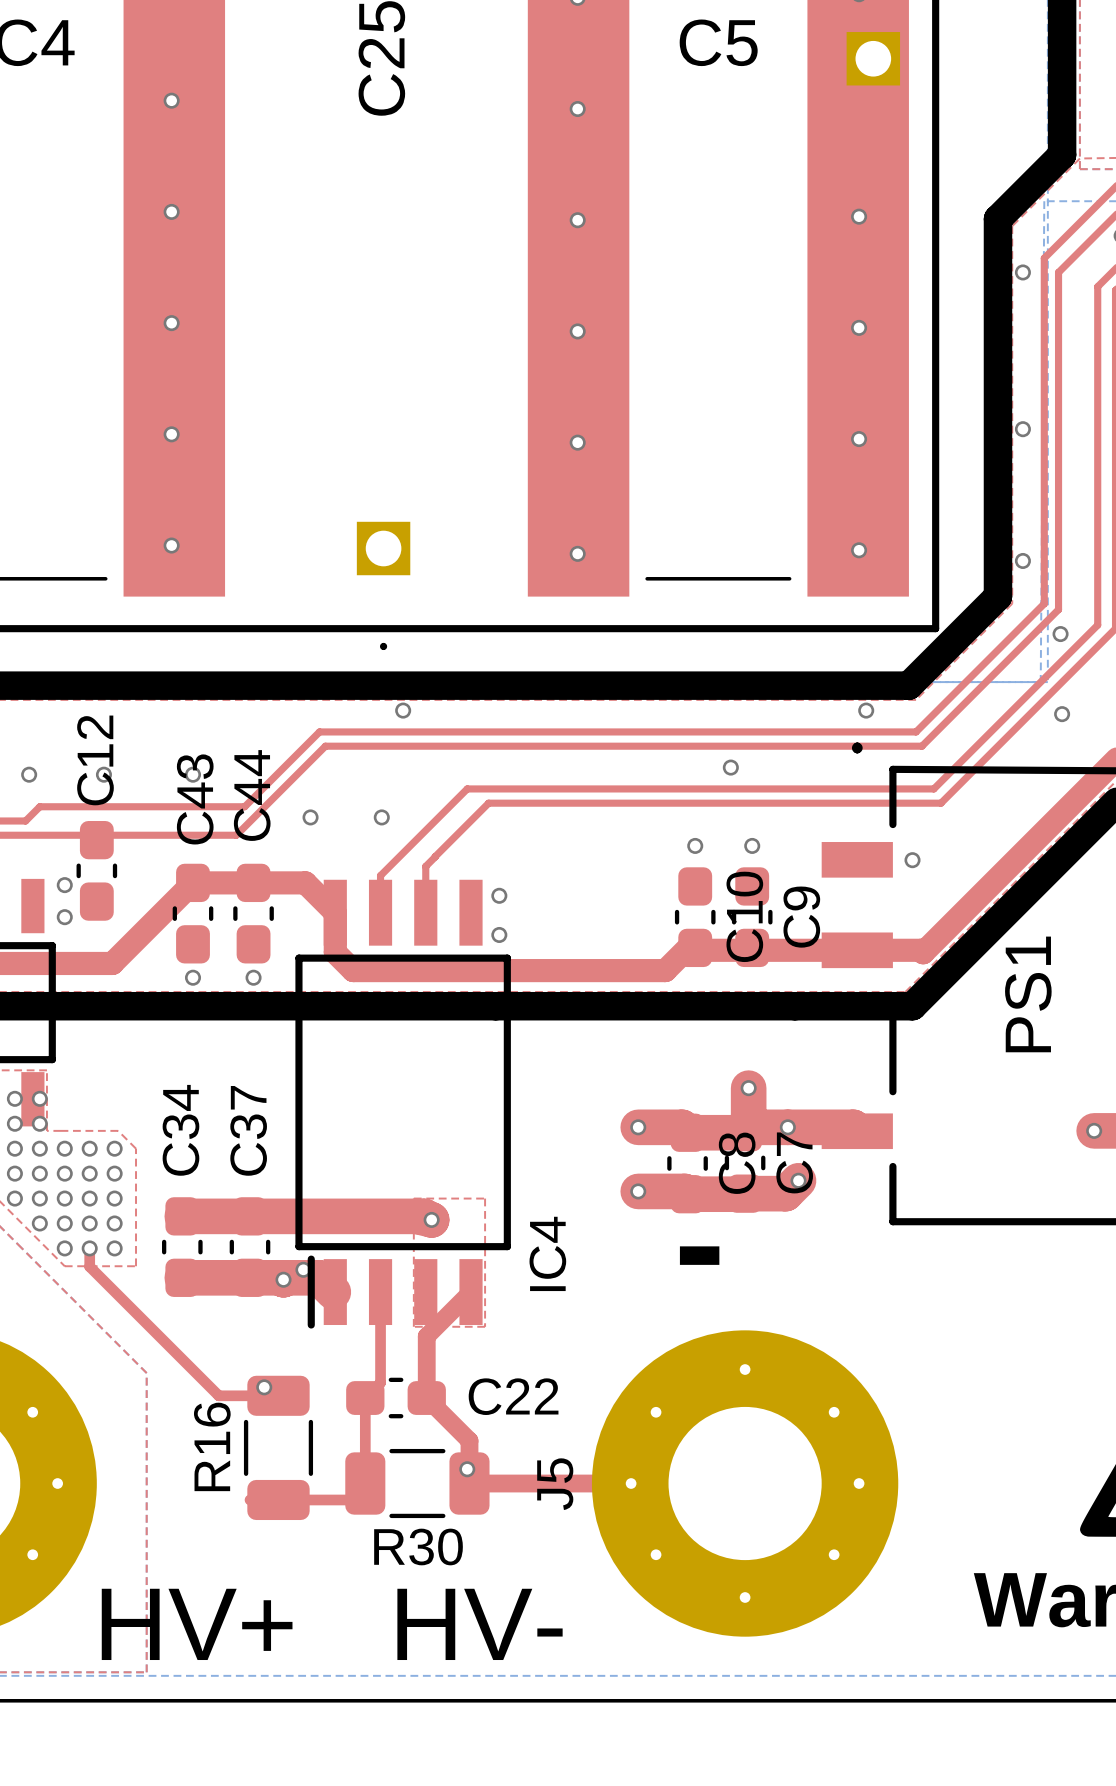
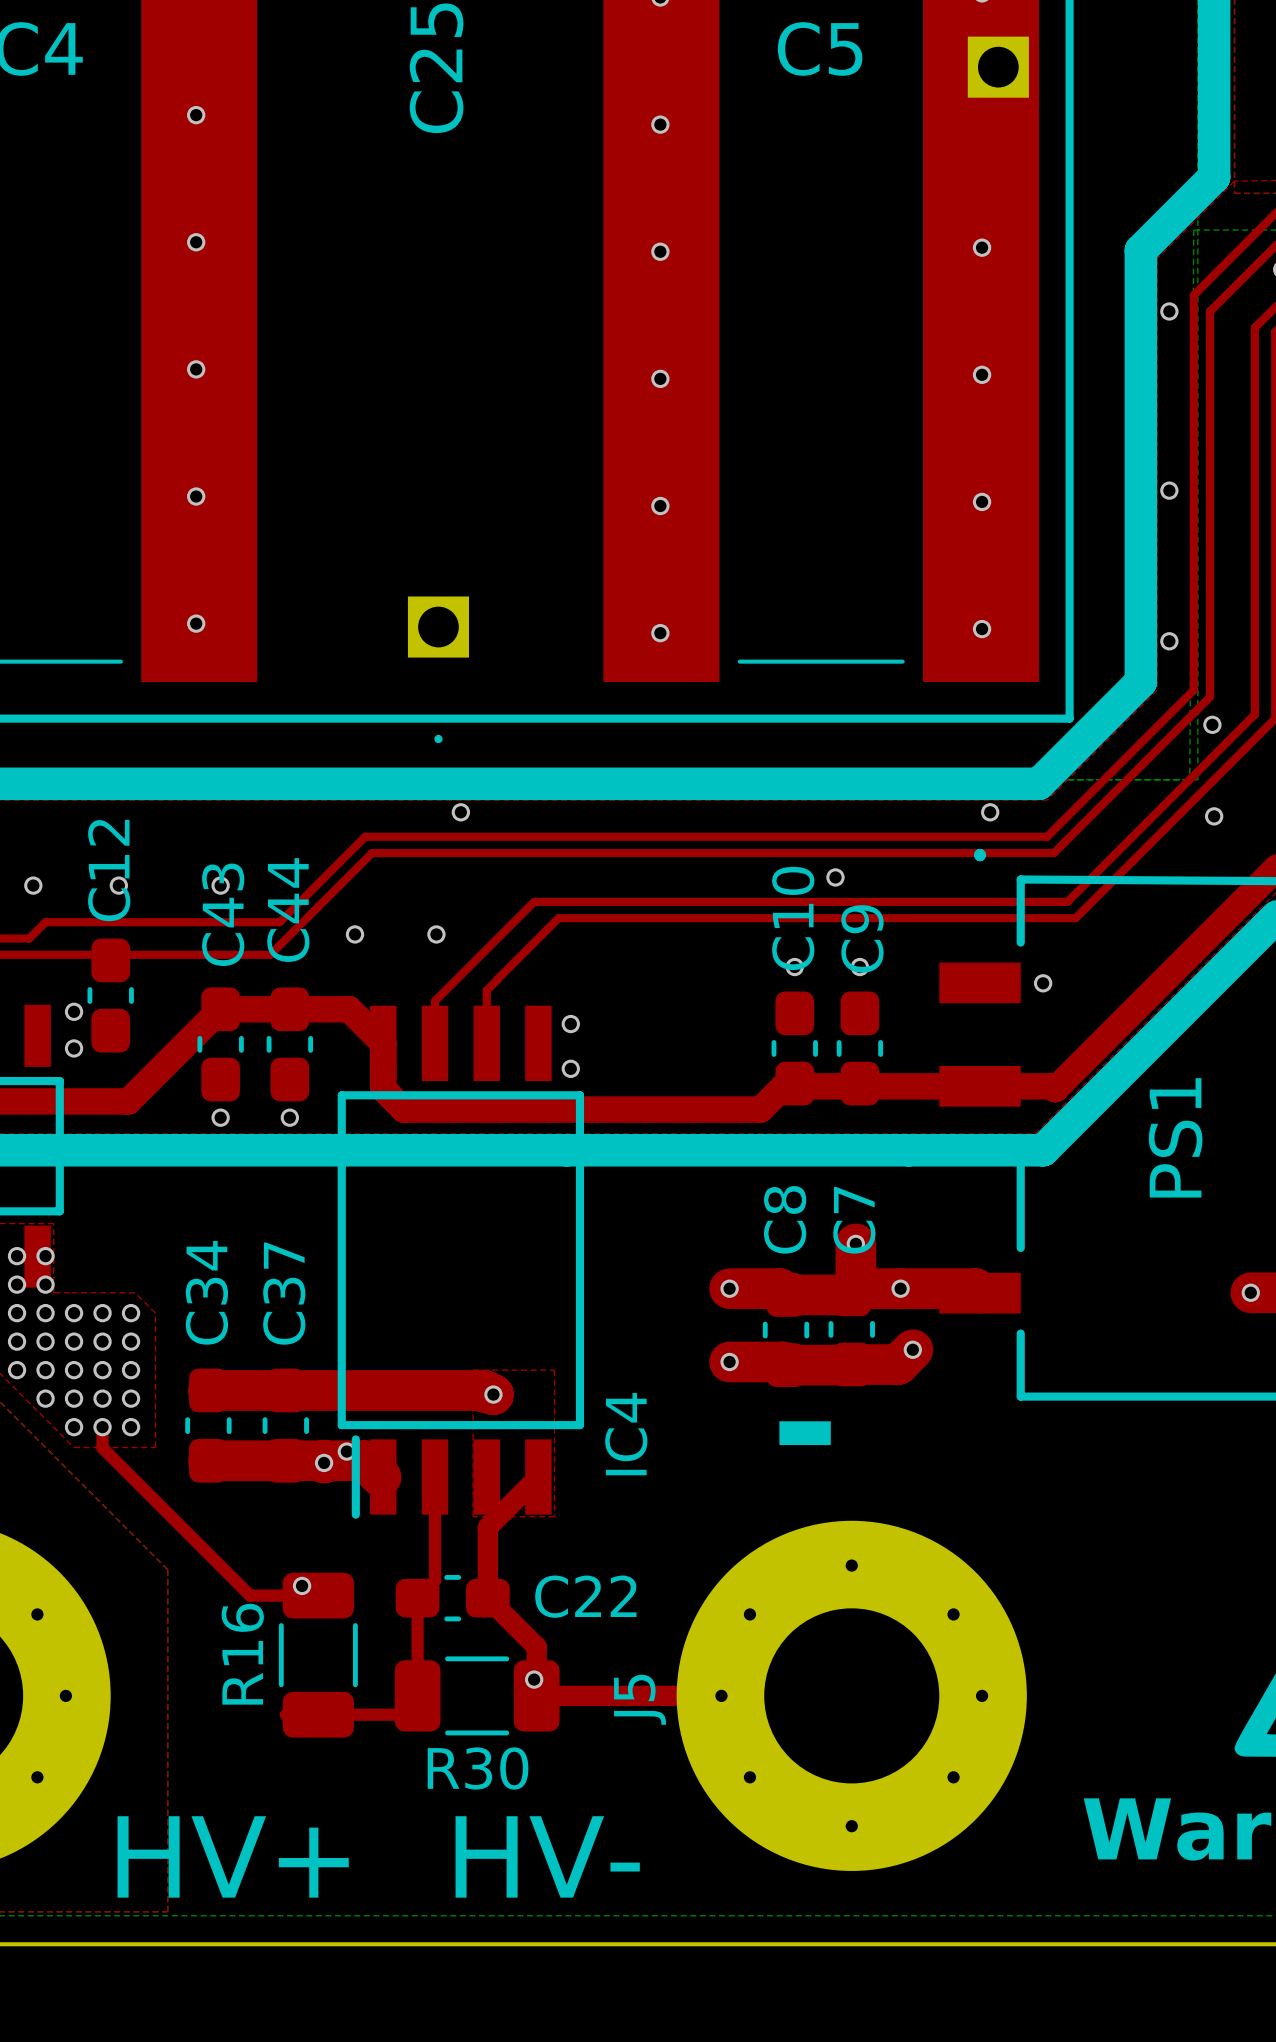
C10 name position: C10 (744, 916) -> C10 (793, 918)
C9 name position: C9 (801, 917) -> C9 (862, 938)
C7 name position: C7 (794, 1162) -> C7 (854, 1220)
C8 name position: C8 (737, 1163) -> C8 (785, 1219)

